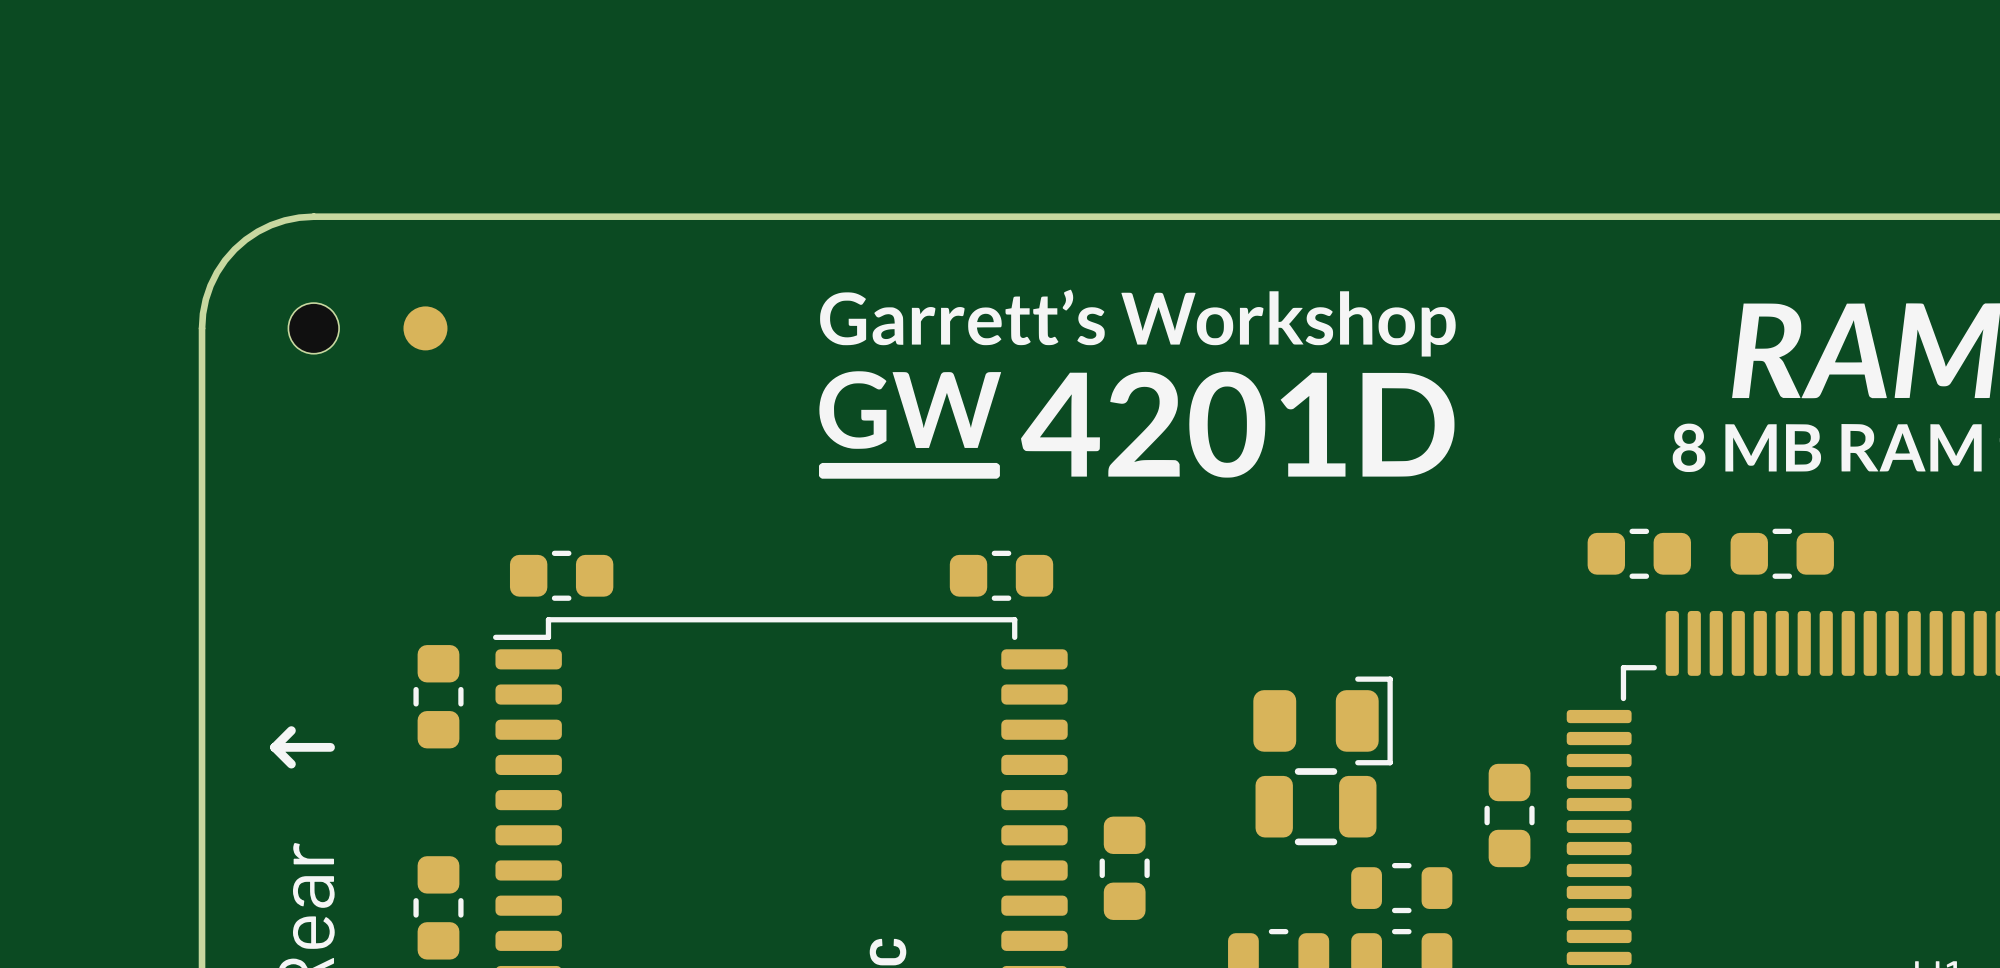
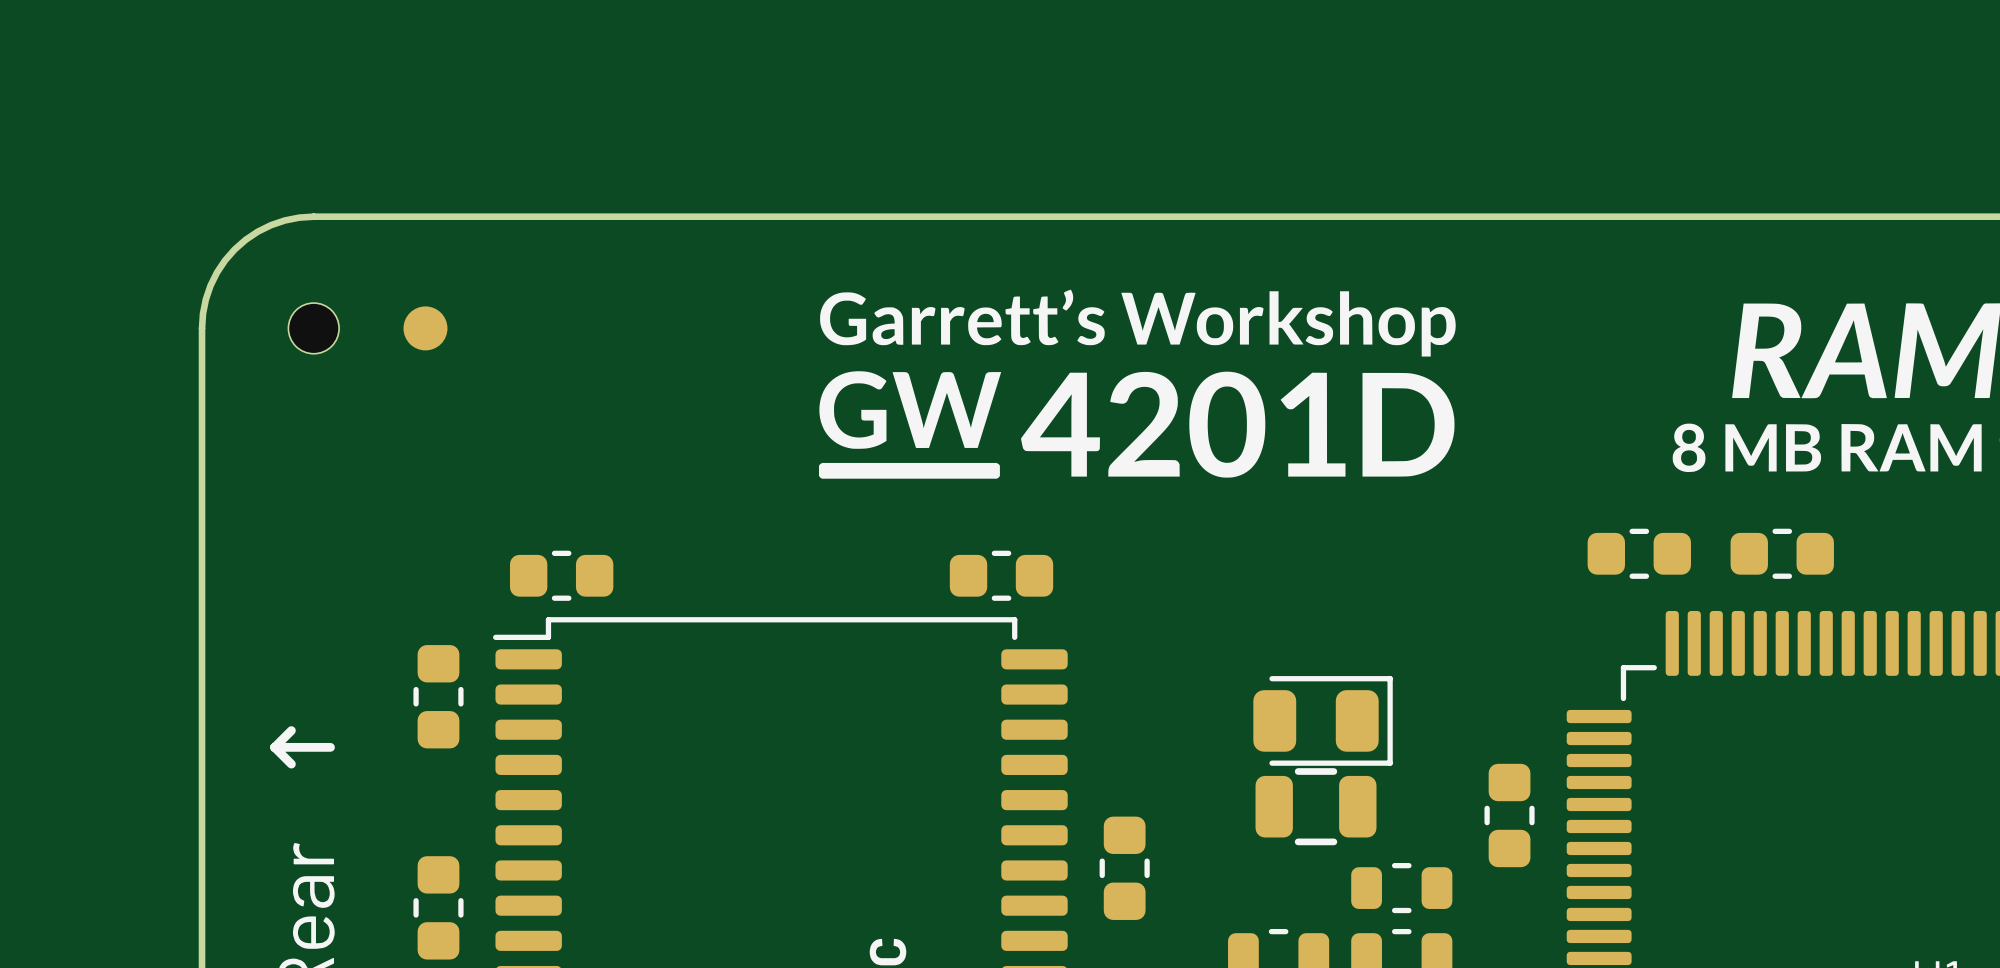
part footprint: [1253, 676, 1393, 766] -> [1253, 676, 1393, 766]

